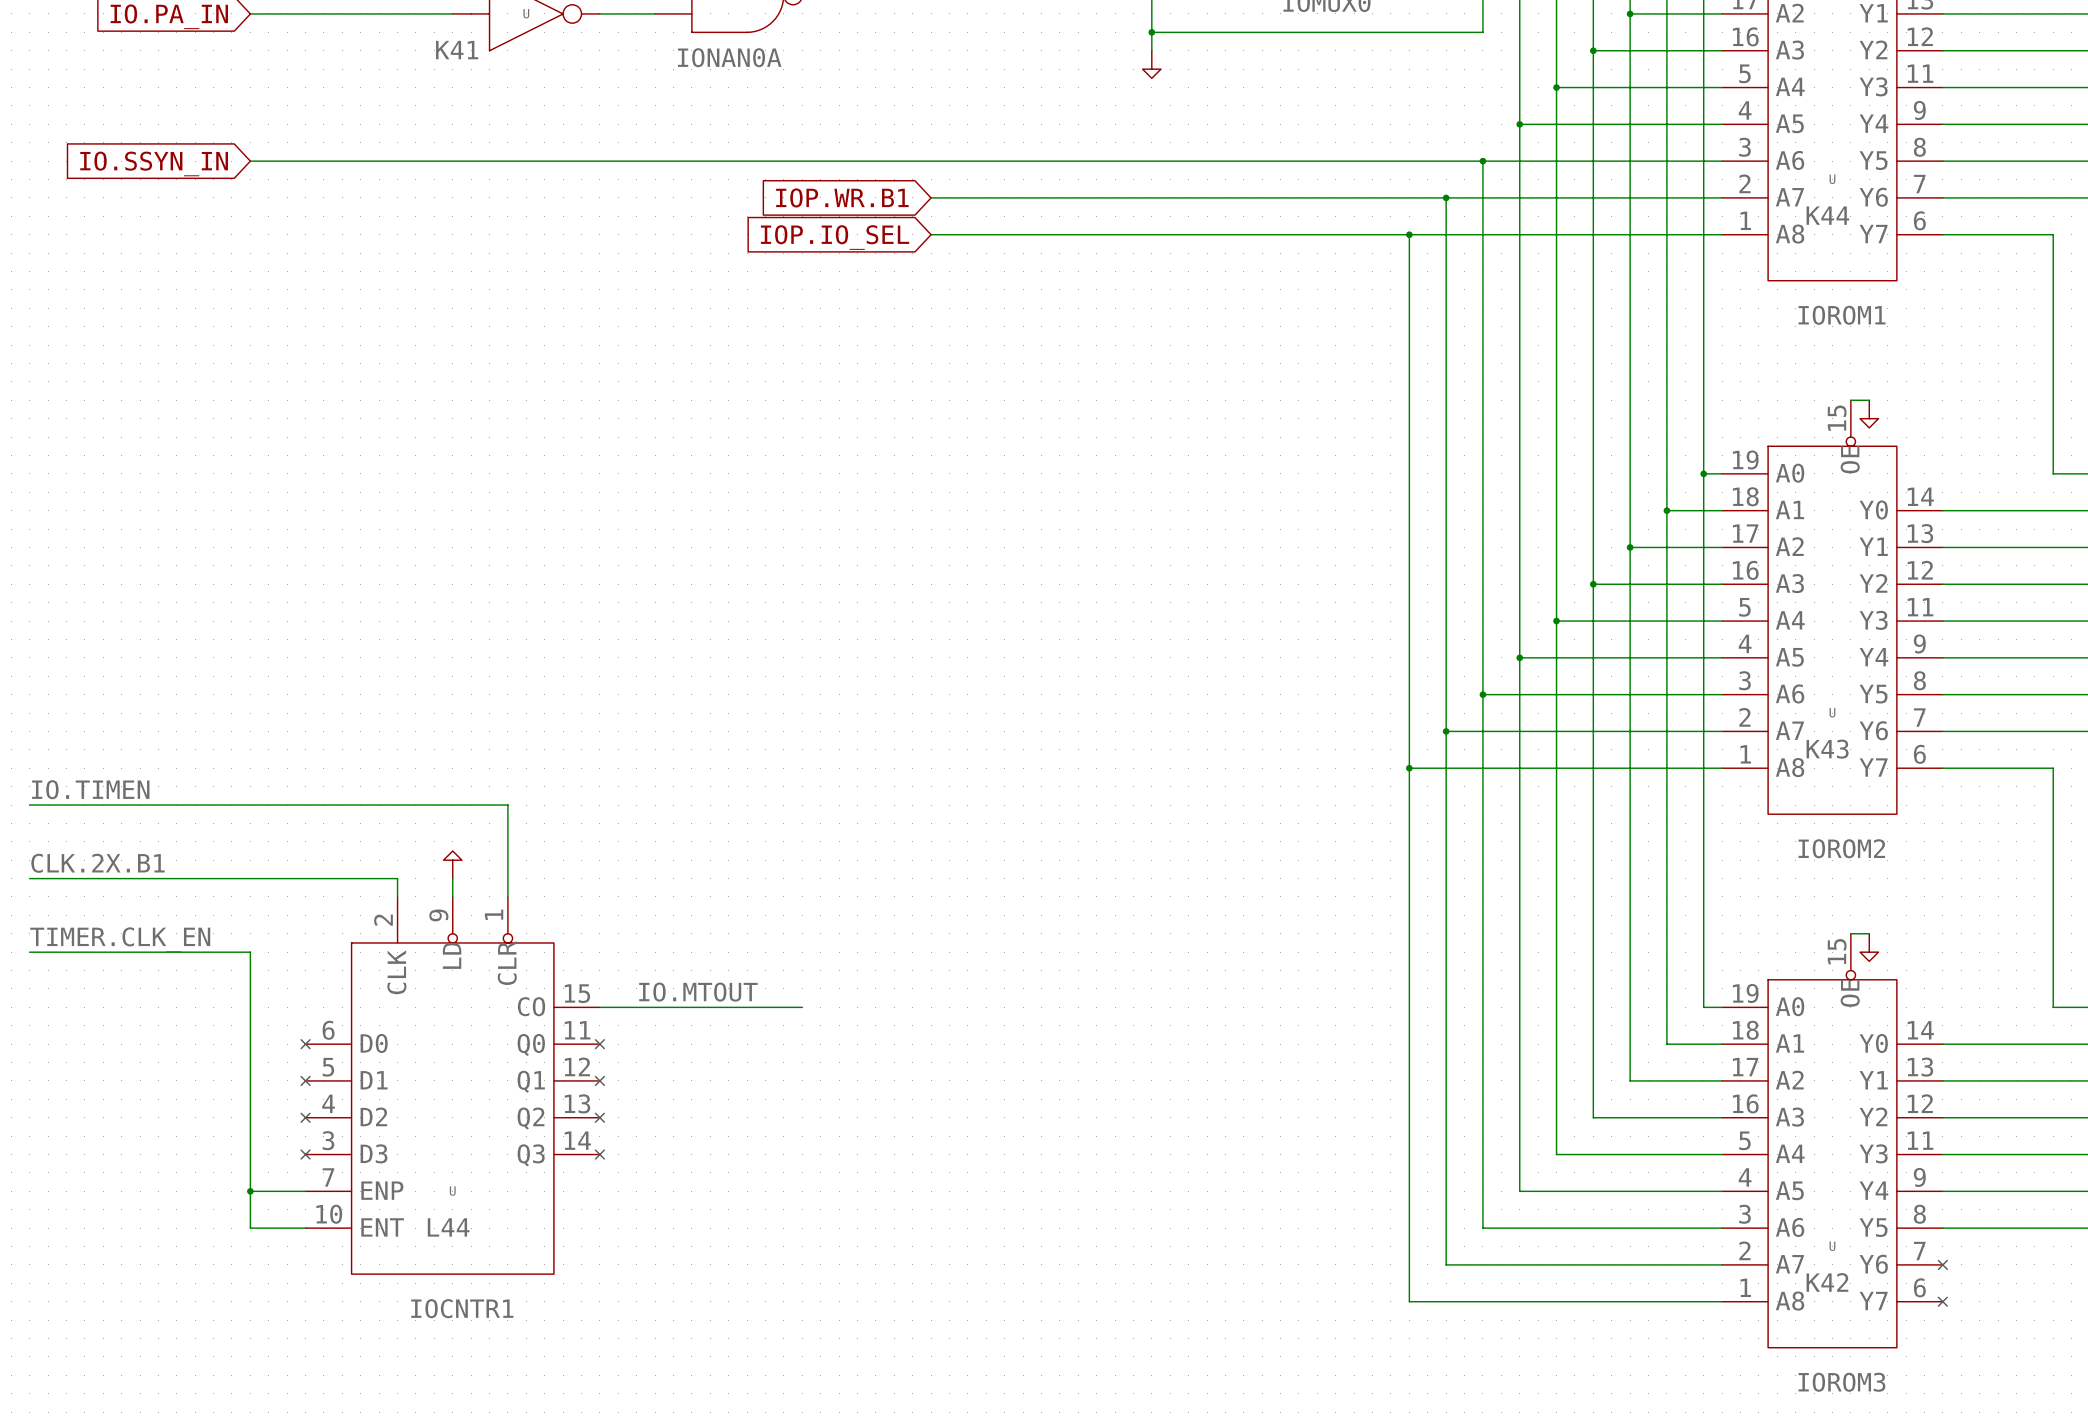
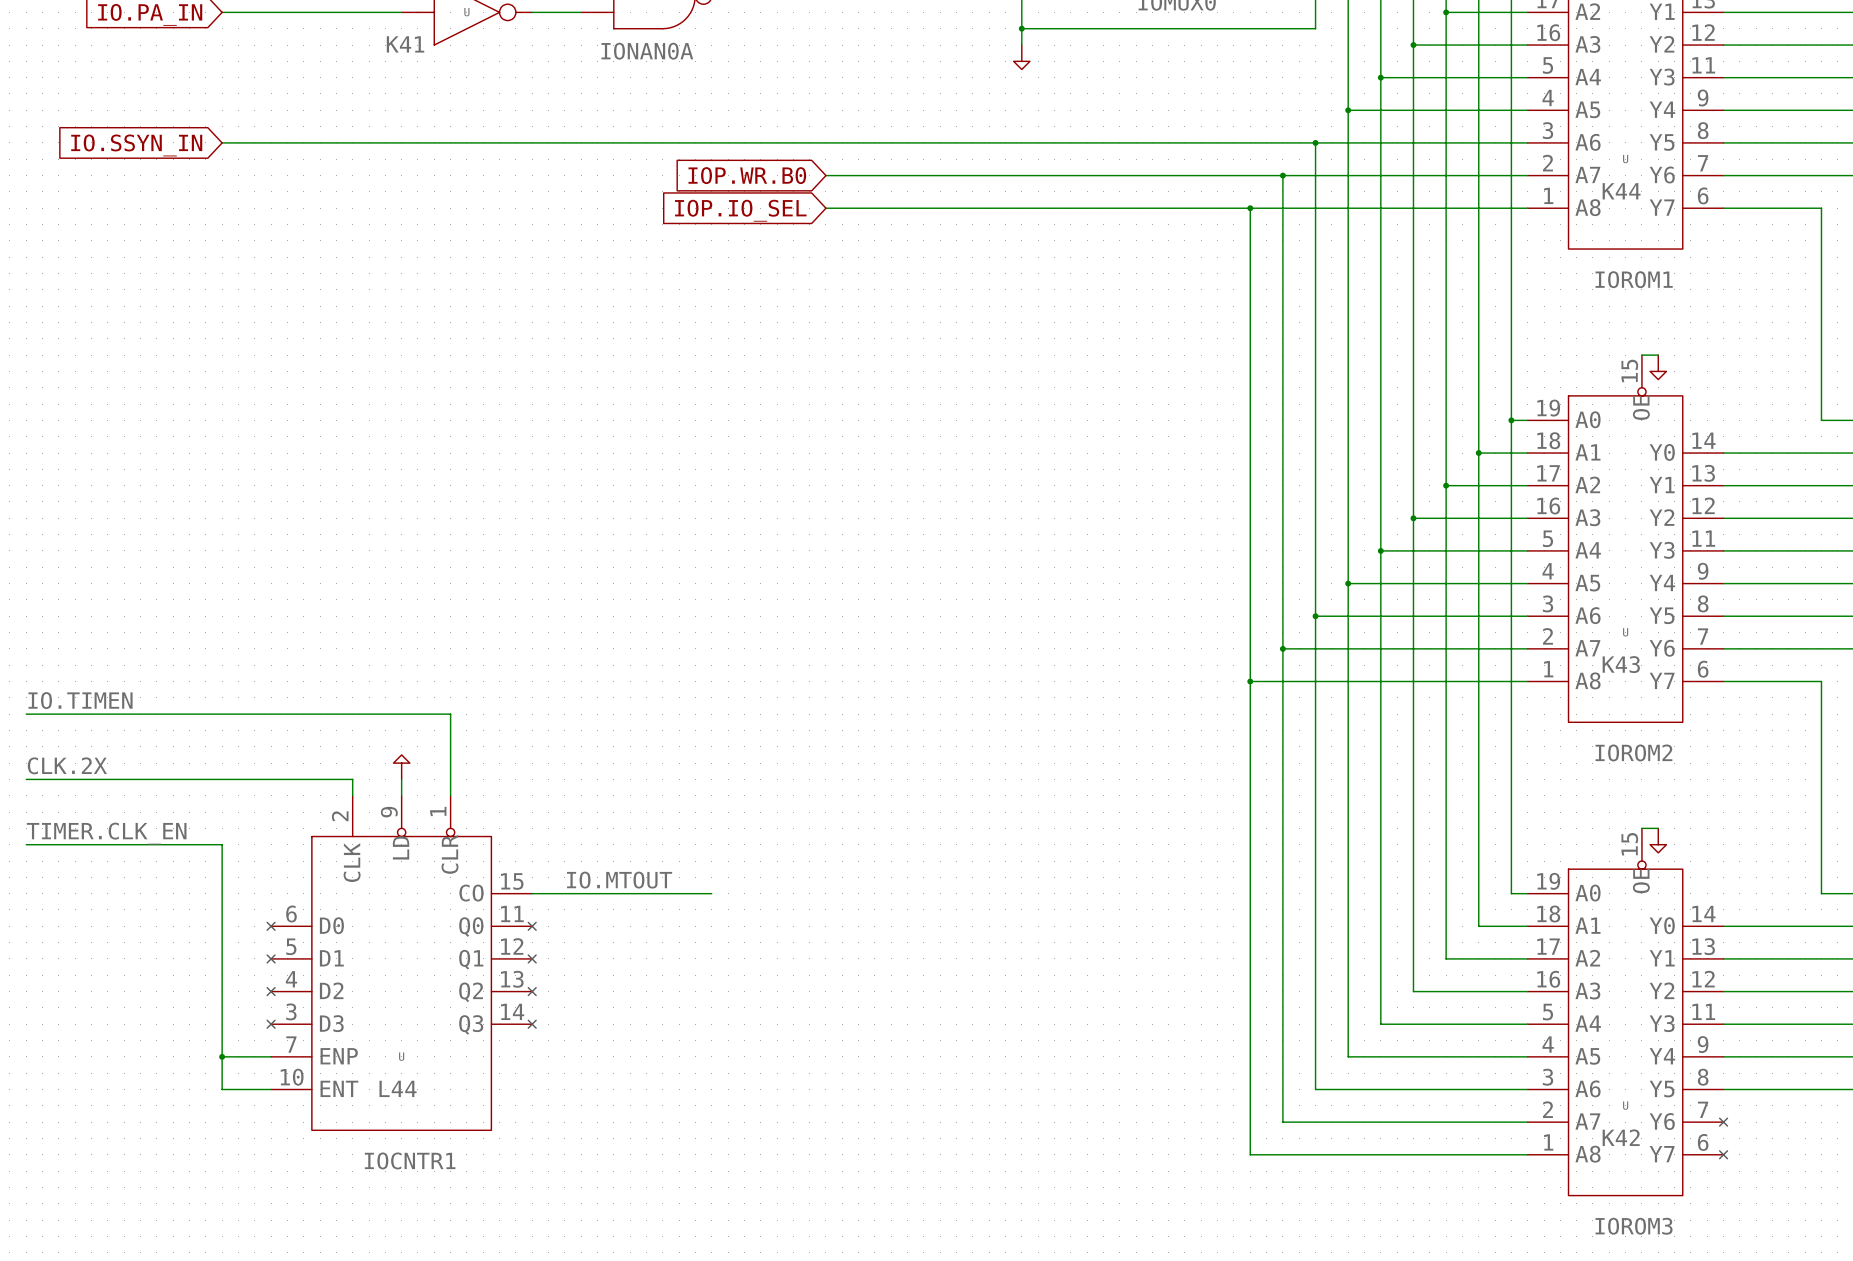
global label: IOP.WR.B1 (842, 197) -> IOP.WR.B0 (747, 175)
label: CLK.2X.B1 (97, 863) -> CLK.2X (67, 765)

